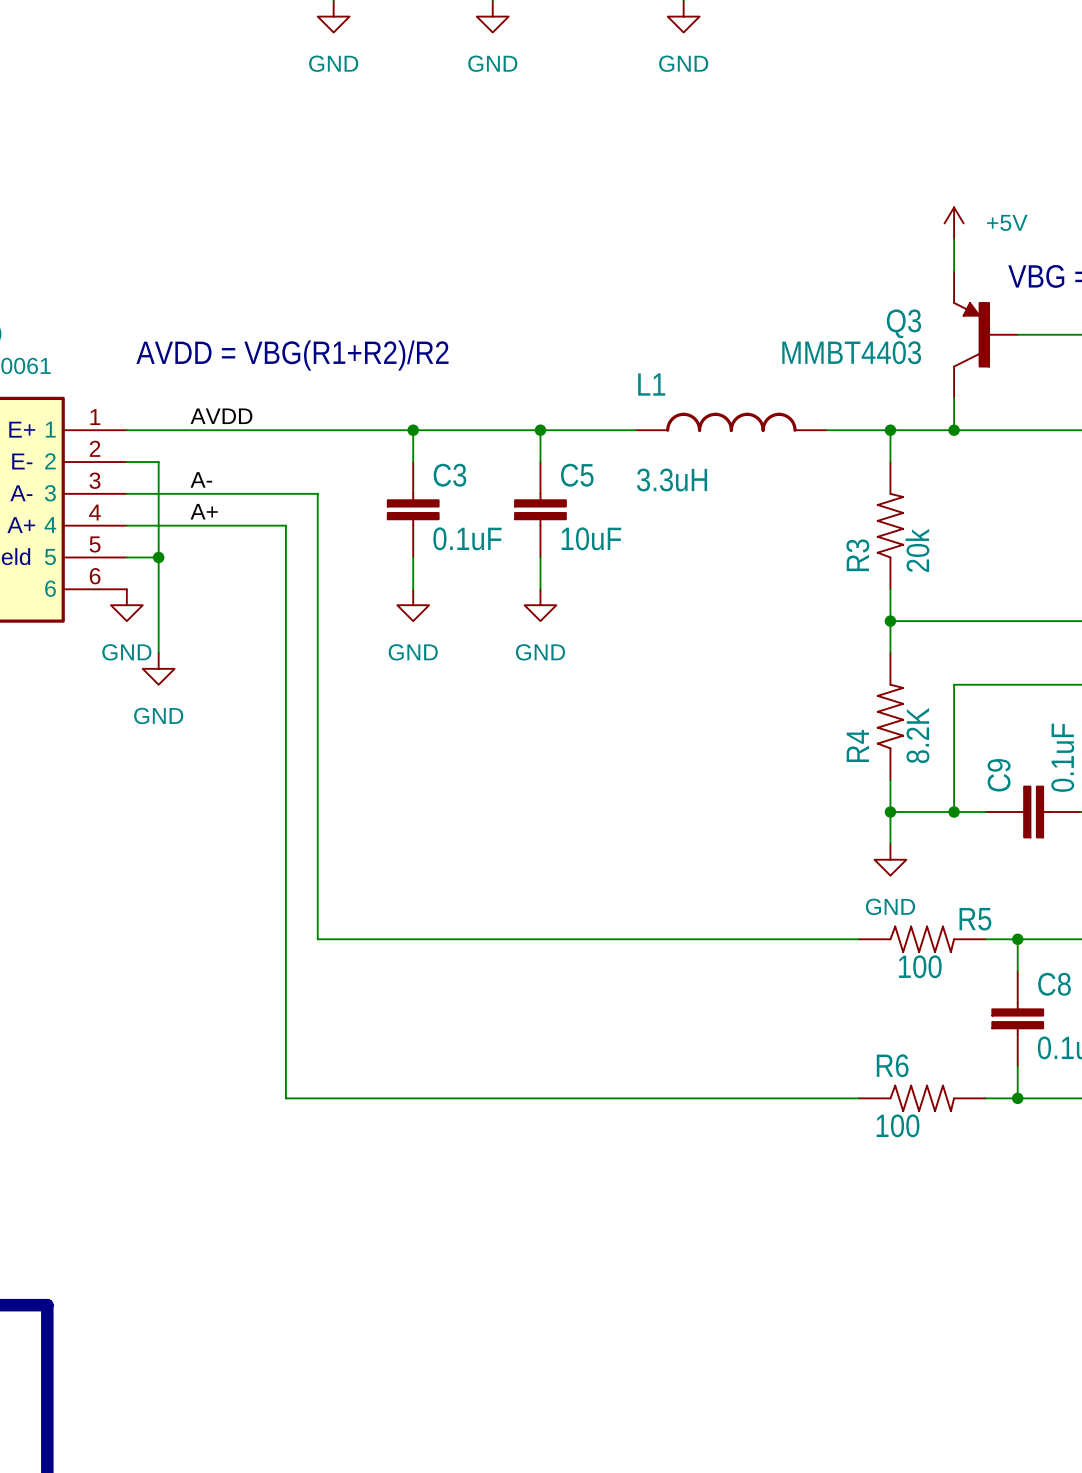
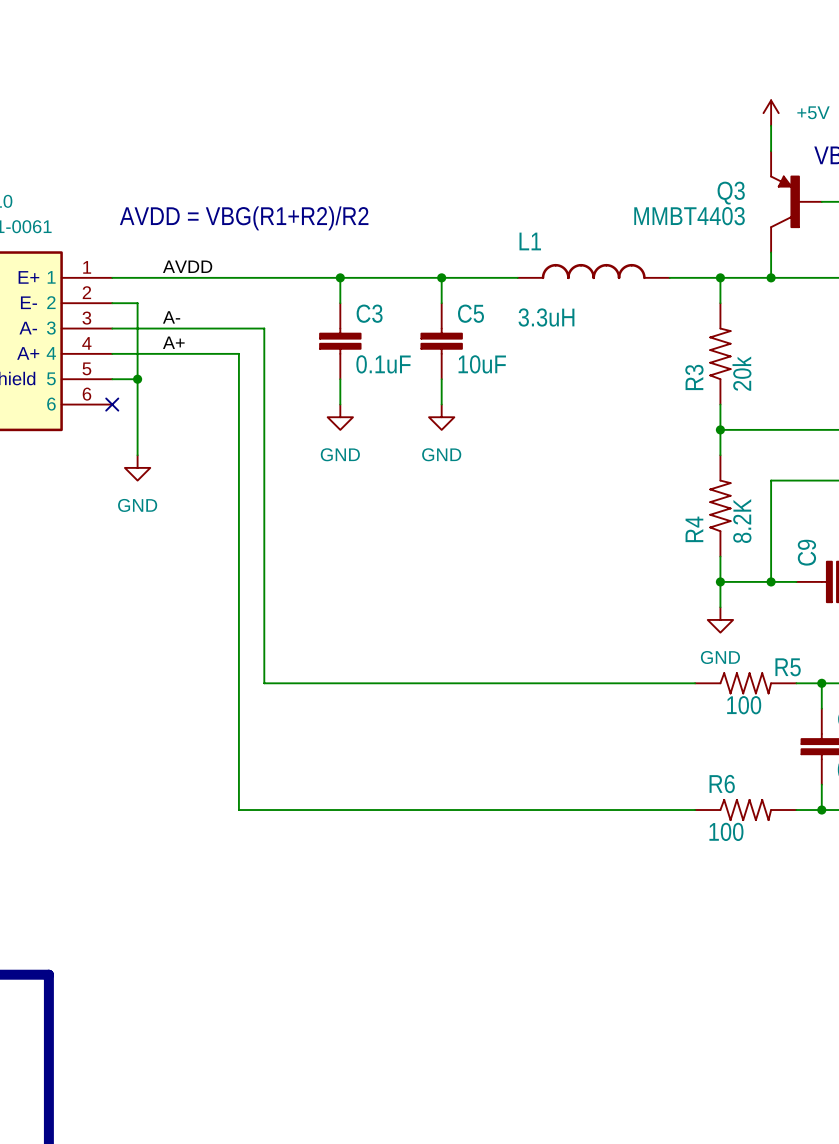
no-connect mark: none -> (112, 404)
power symbol: GND (126, 605) -> none

